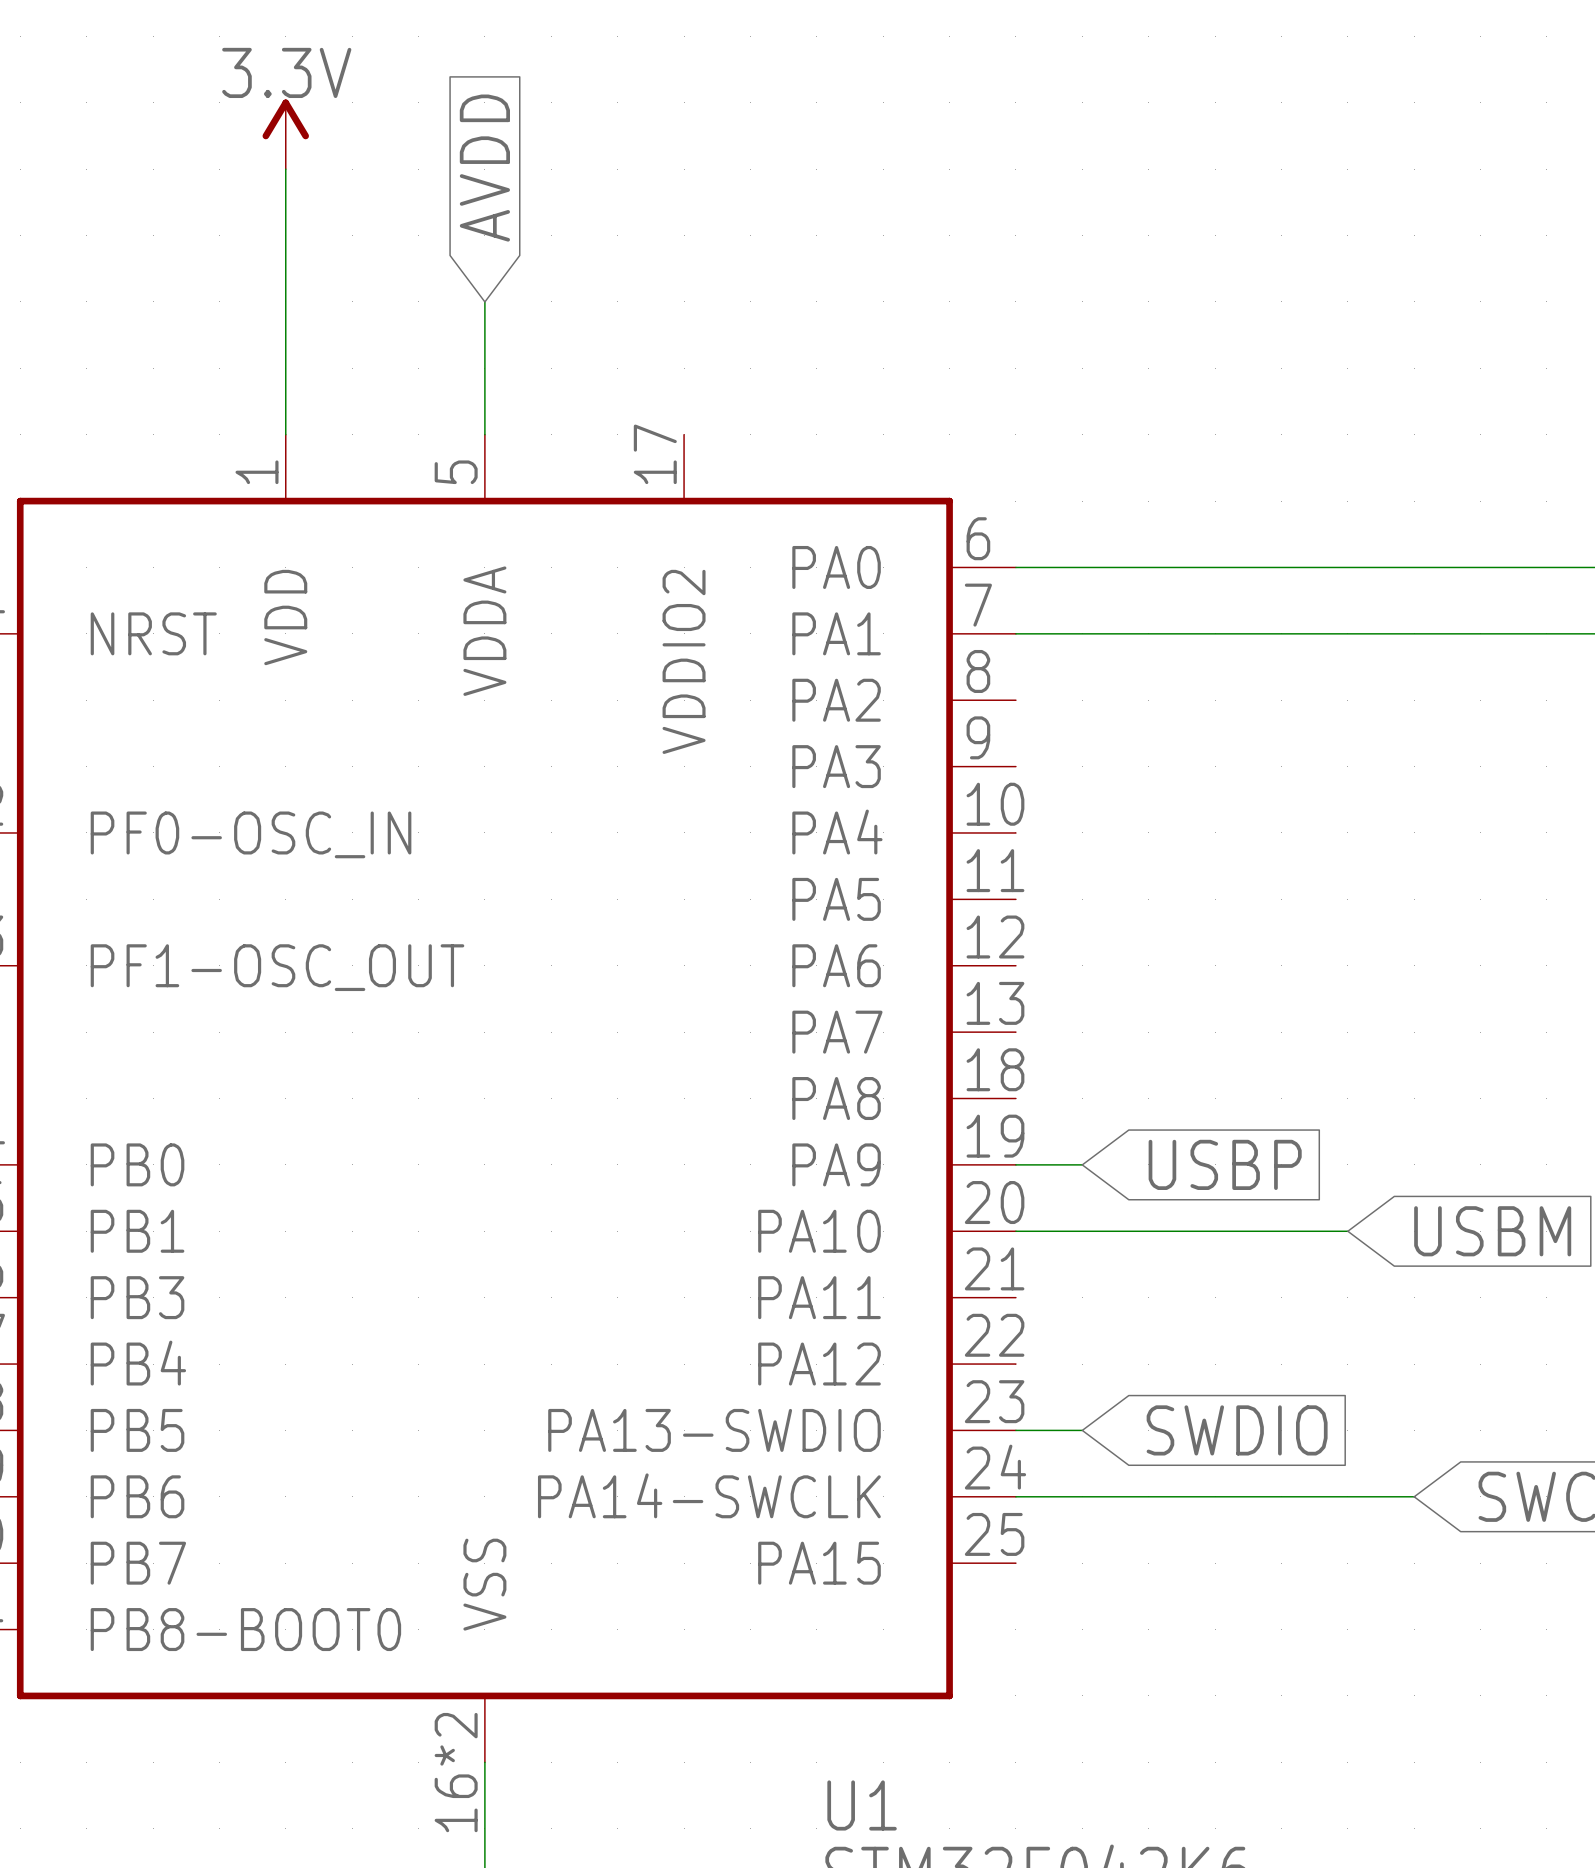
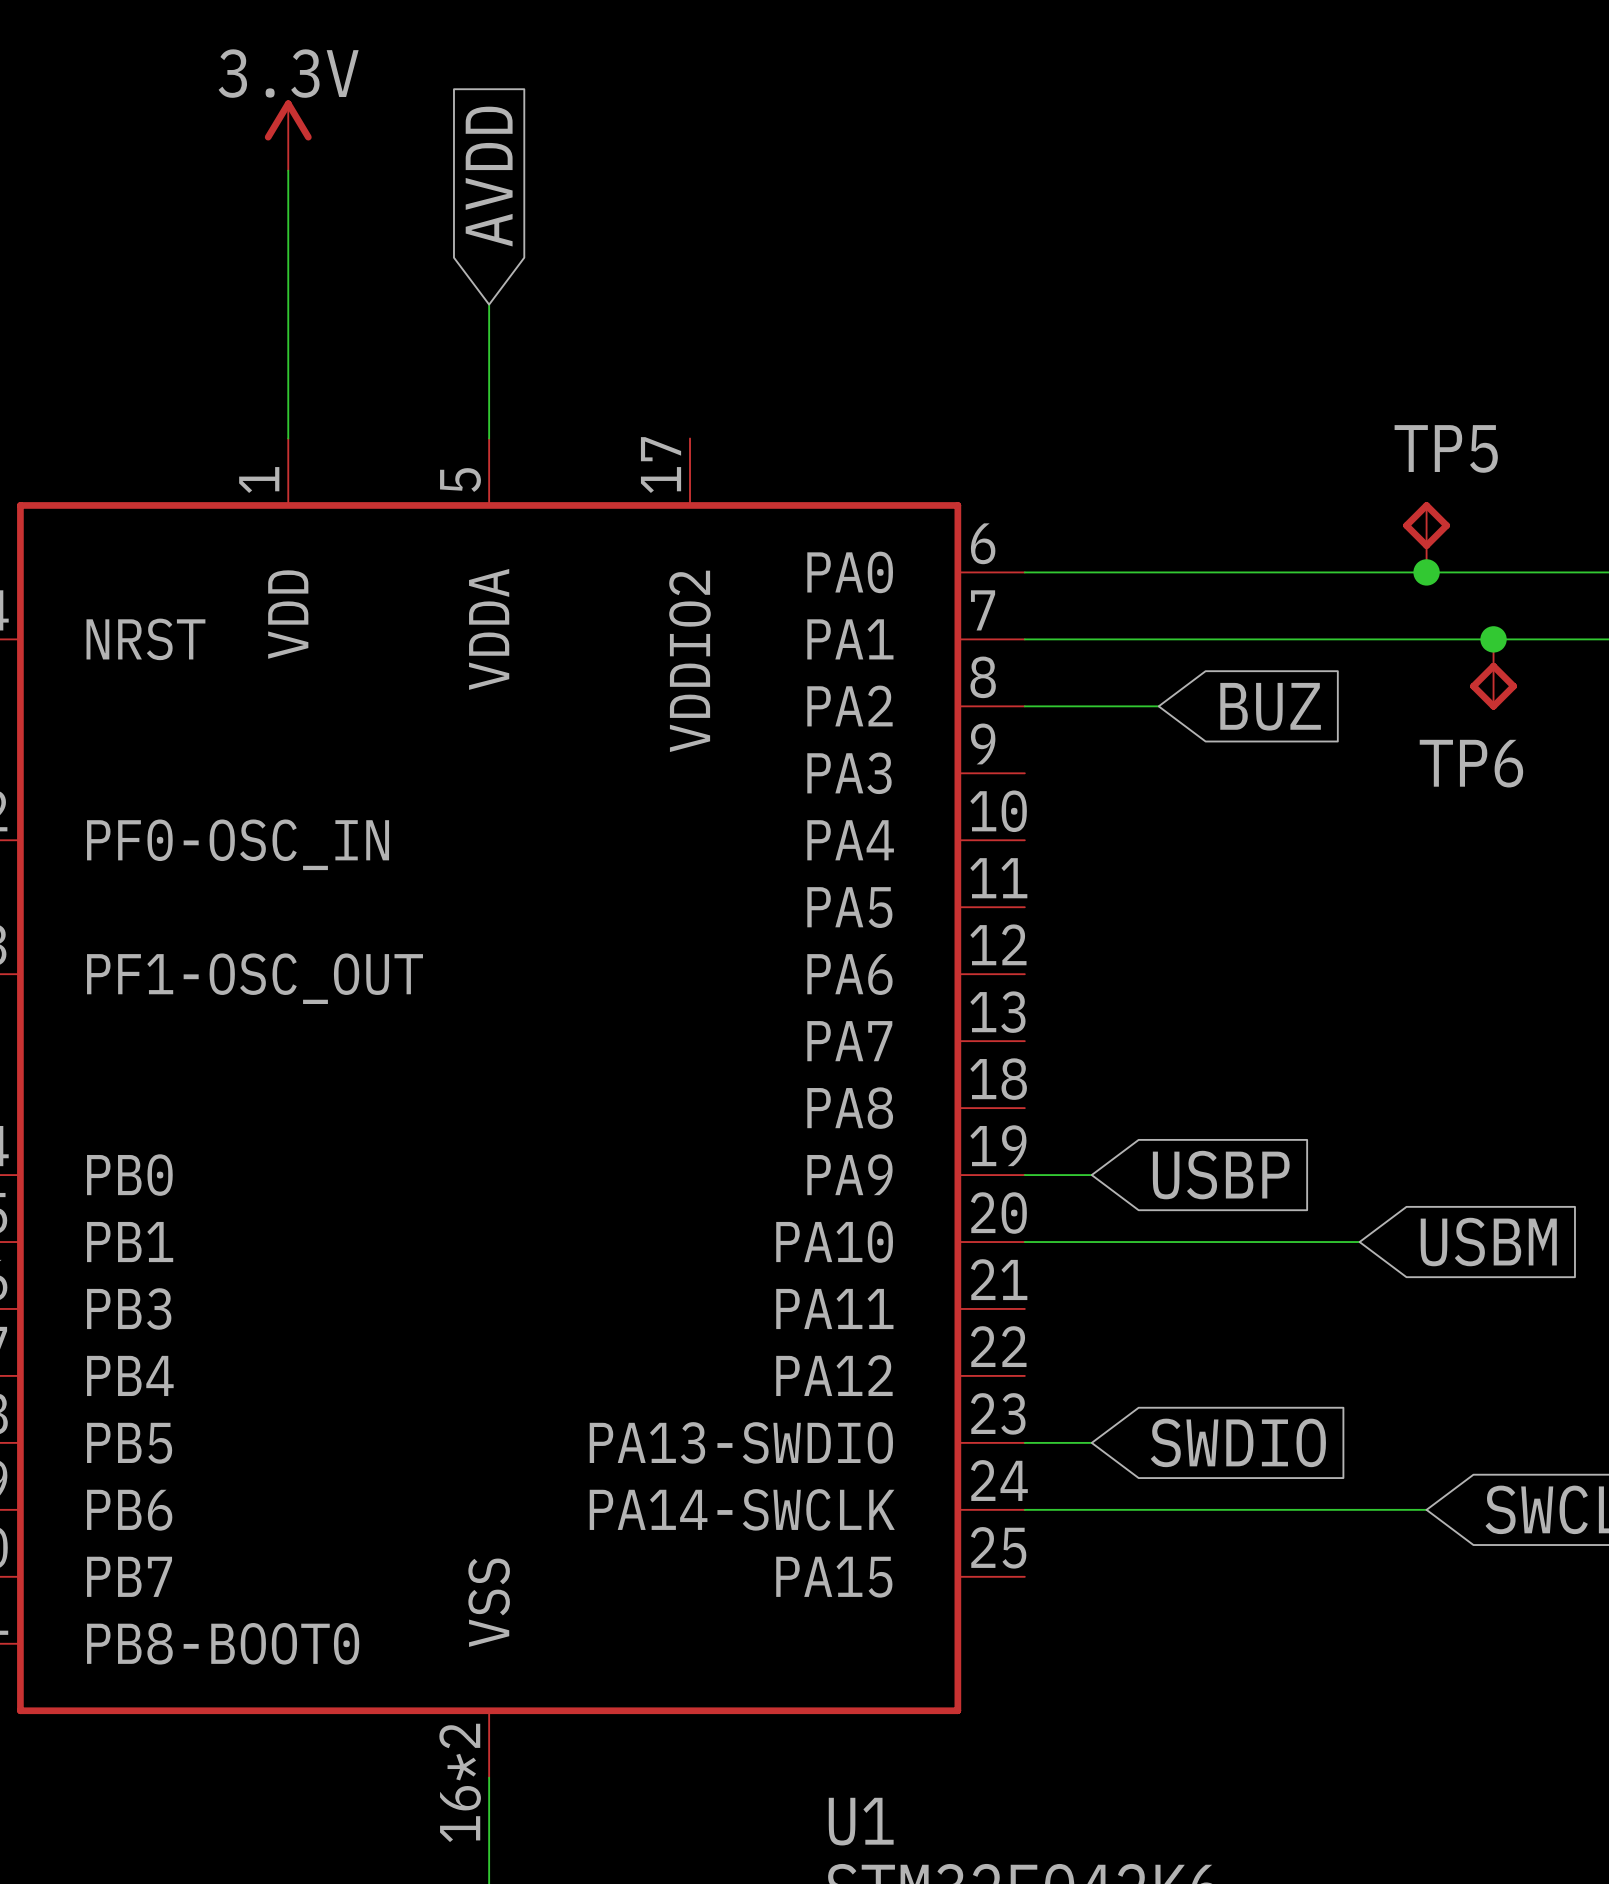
TP5: none -> (1426, 537)
junction: none -> (1426, 572)
junction: none -> (1493, 639)
TP6: none -> (1493, 674)
wire: none -> (1024, 706) (1158, 706)
global label: none -> BUZ (1270, 706)

